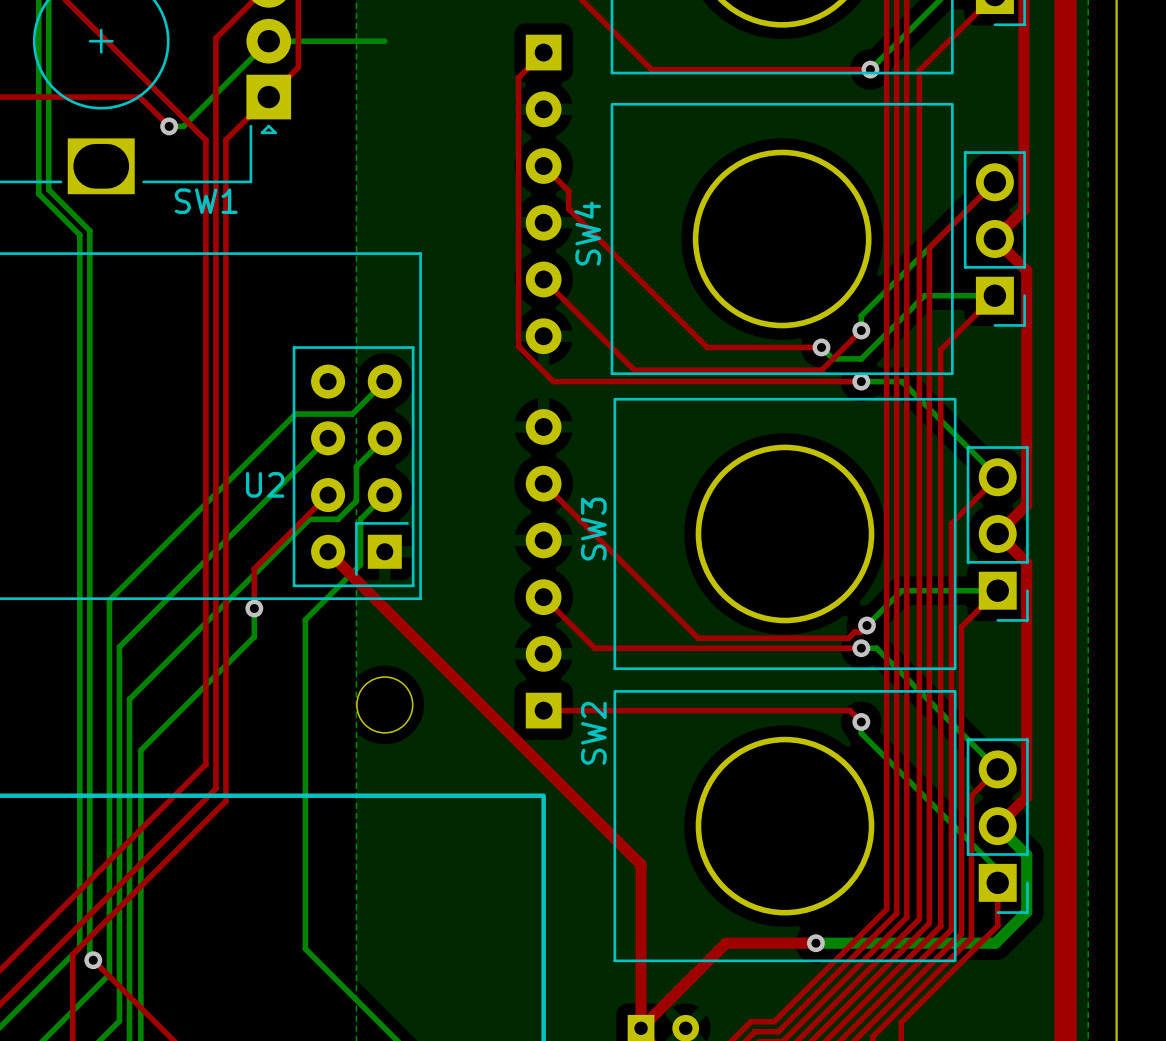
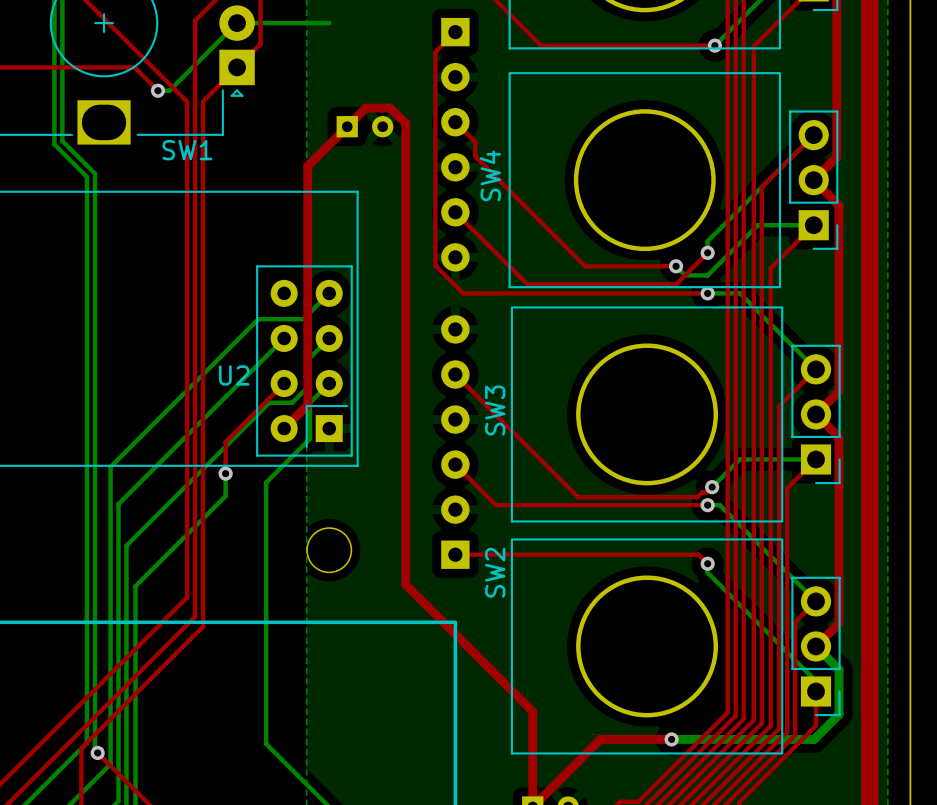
part: none -> (364, 126)
top track: (328, 551) (641, 864) (641, 908) -> (284, 428) (307, 405) (307, 166) (365, 108) (390, 108) (405, 123) (405, 584) (532, 711)

